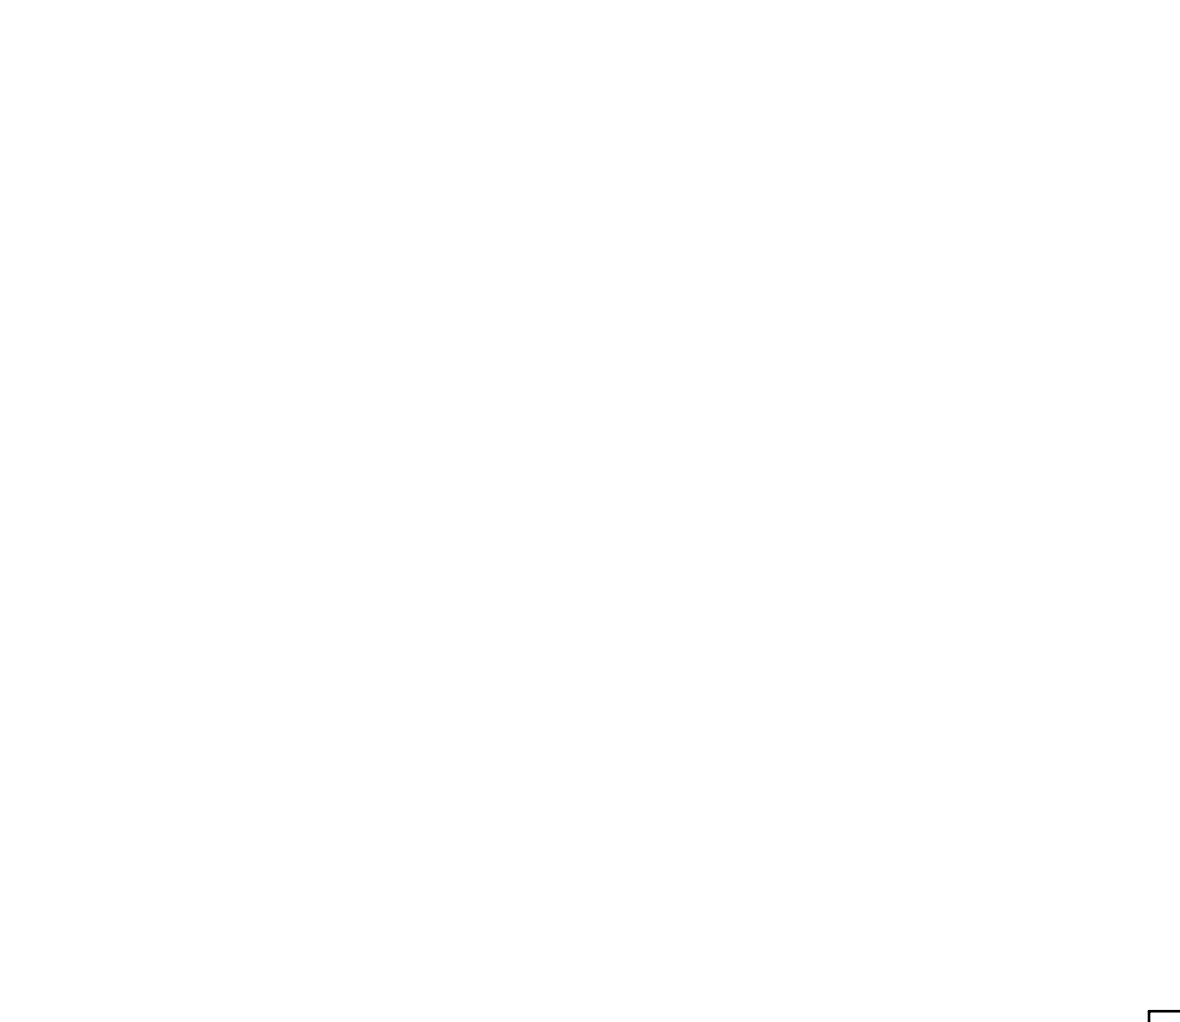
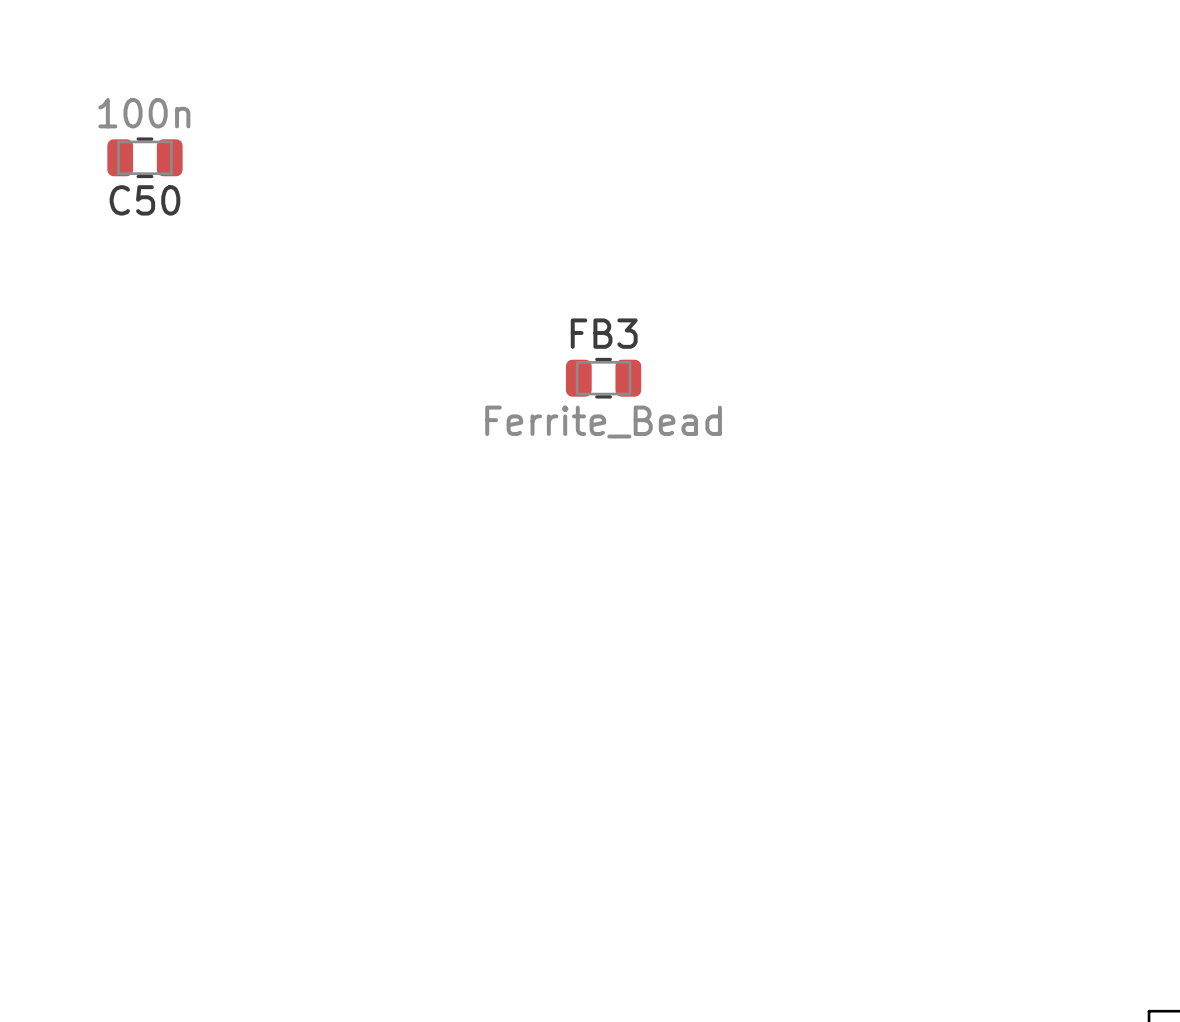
C50: none -> 100n (144, 157)
FB3: none -> Ferrite_Bead (603, 378)

